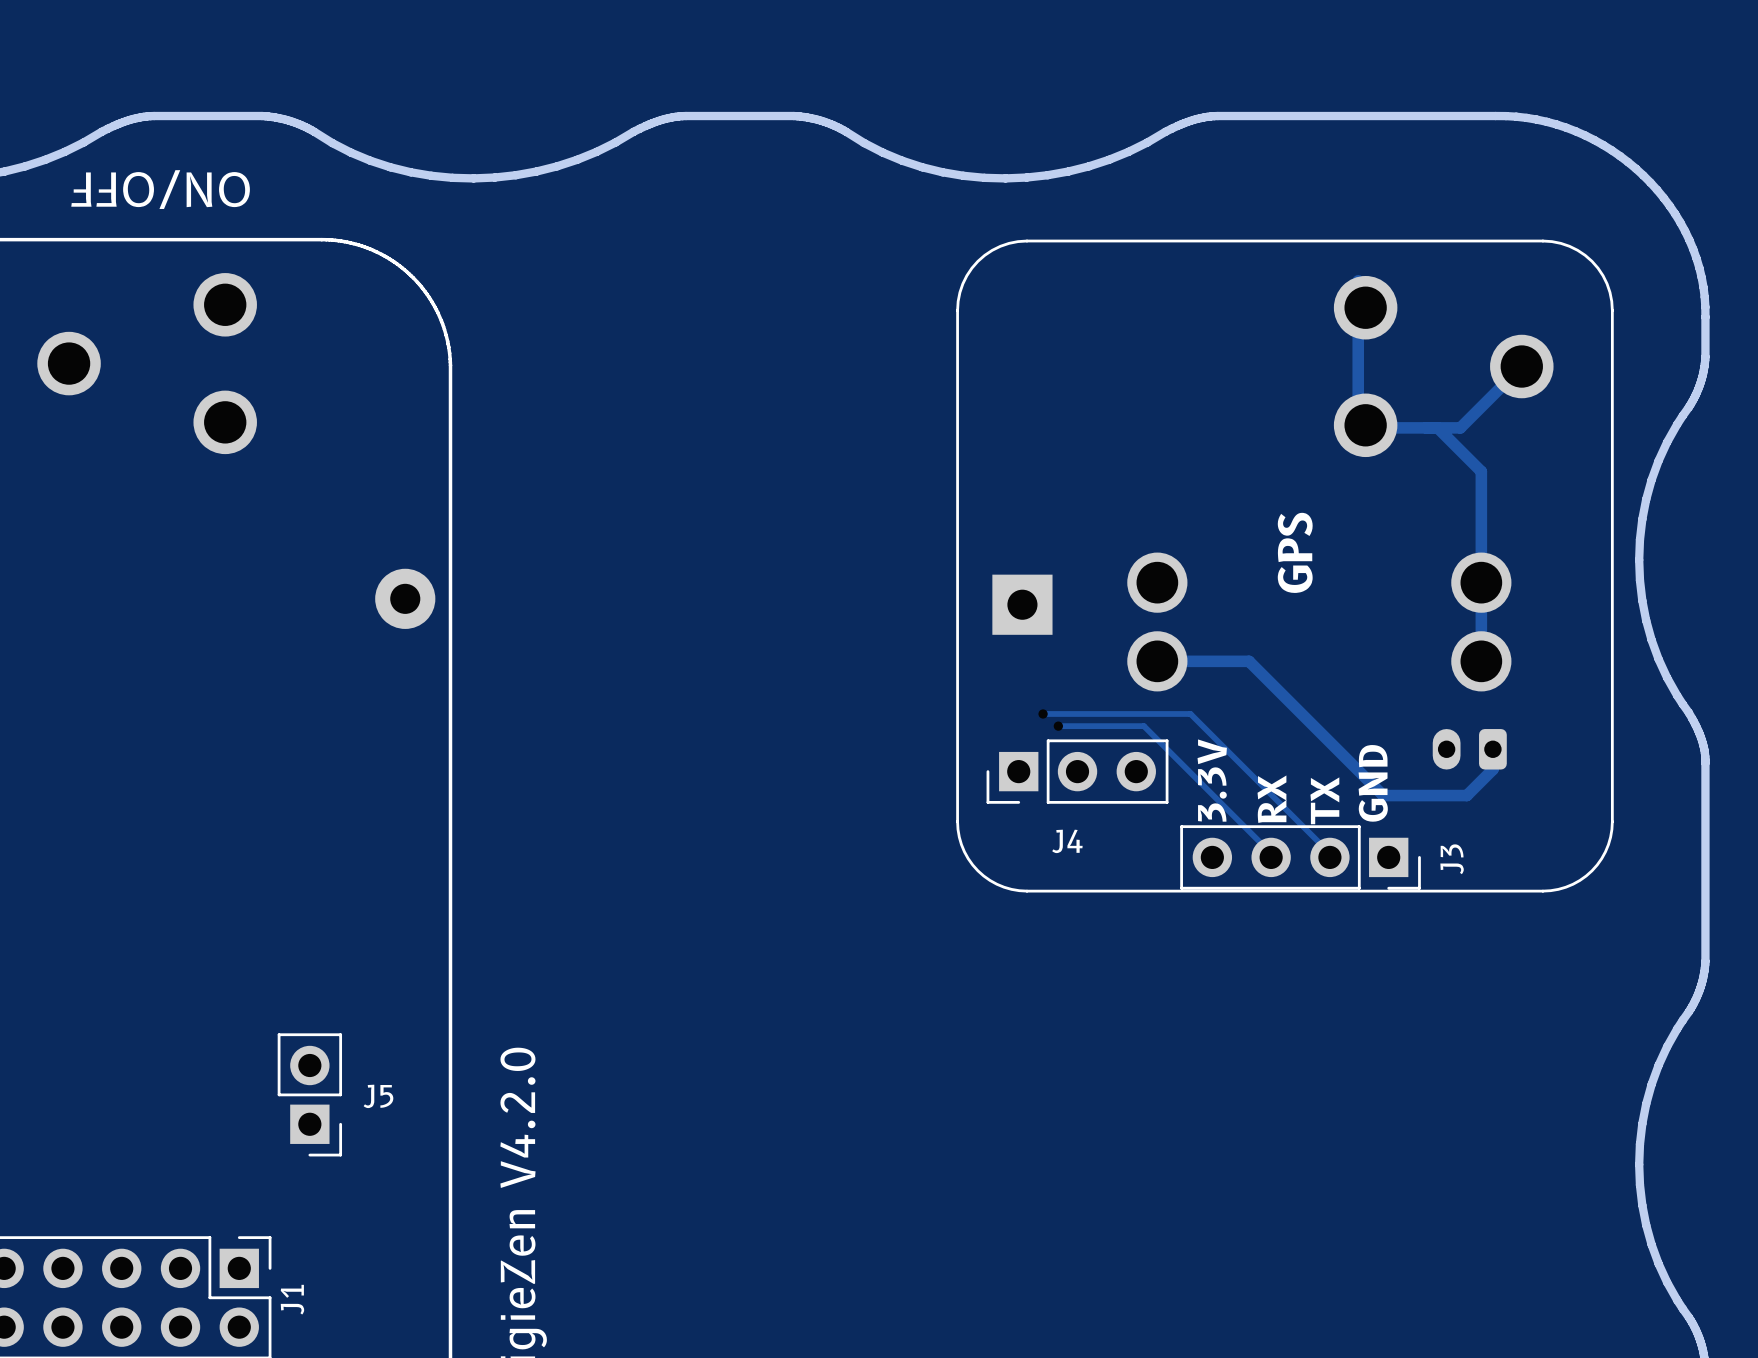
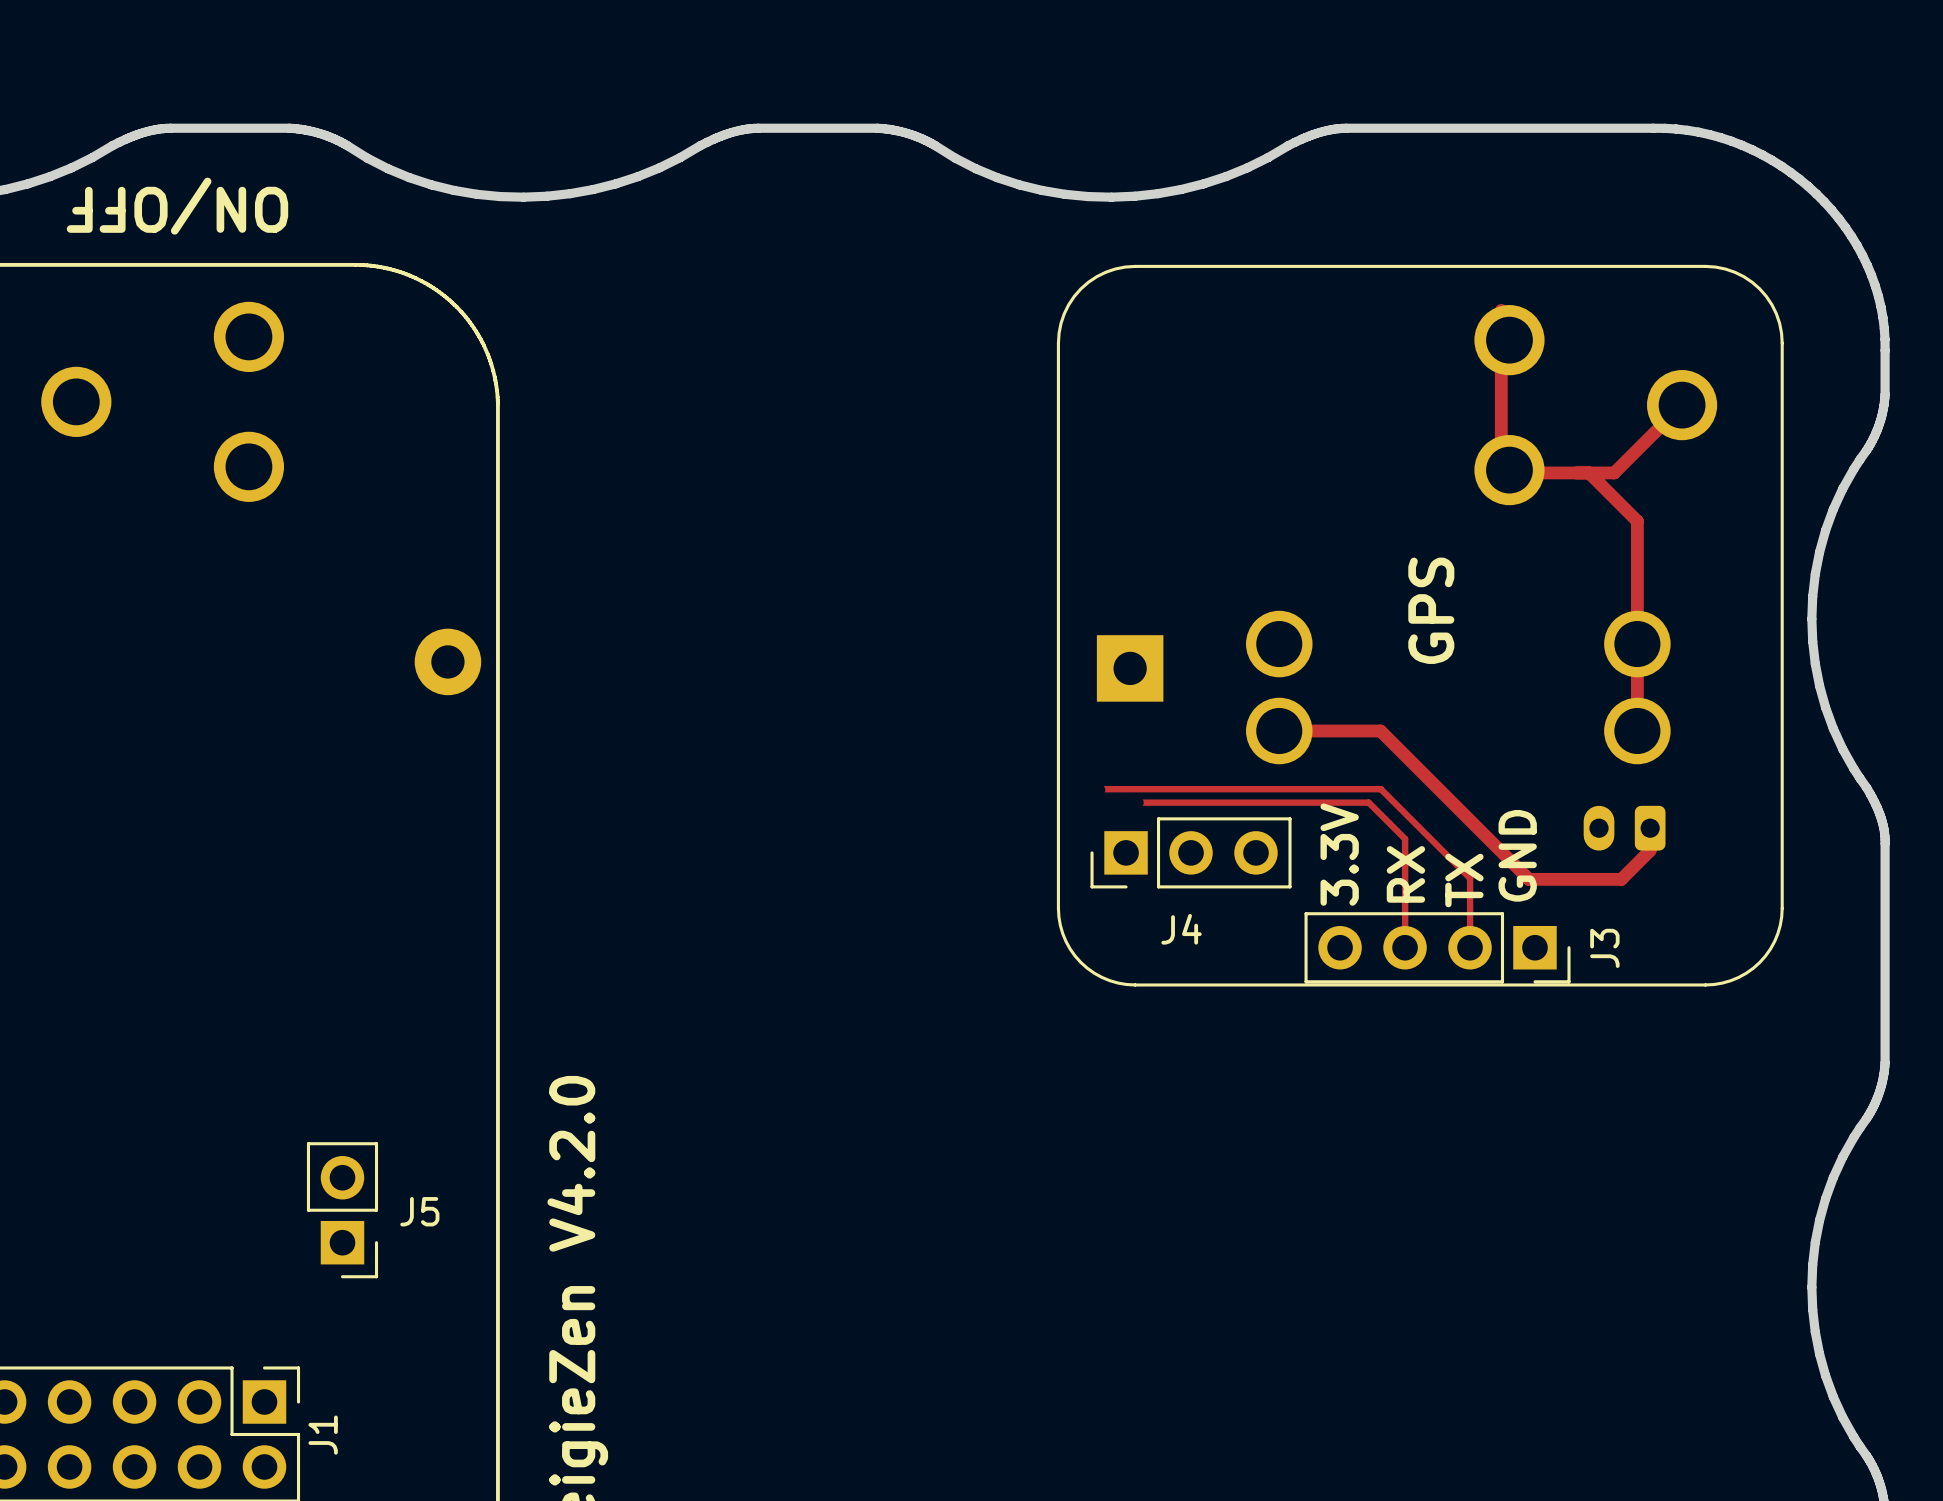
track: none -> (1152, 789) (1100, 789)
via: (1043, 713) -> none
track: (1190, 713) (1329, 853) -> (1315, 789) (1380, 789) (1470, 878) (1470, 943)
via: none -> (1100, 789)
track: none -> (1138, 802) (1169, 802)
via: none -> (1138, 802)
via: (1058, 726) -> none
track: (1143, 726) (1271, 853) -> (1264, 802) (1368, 802) (1405, 838) (1405, 943)

